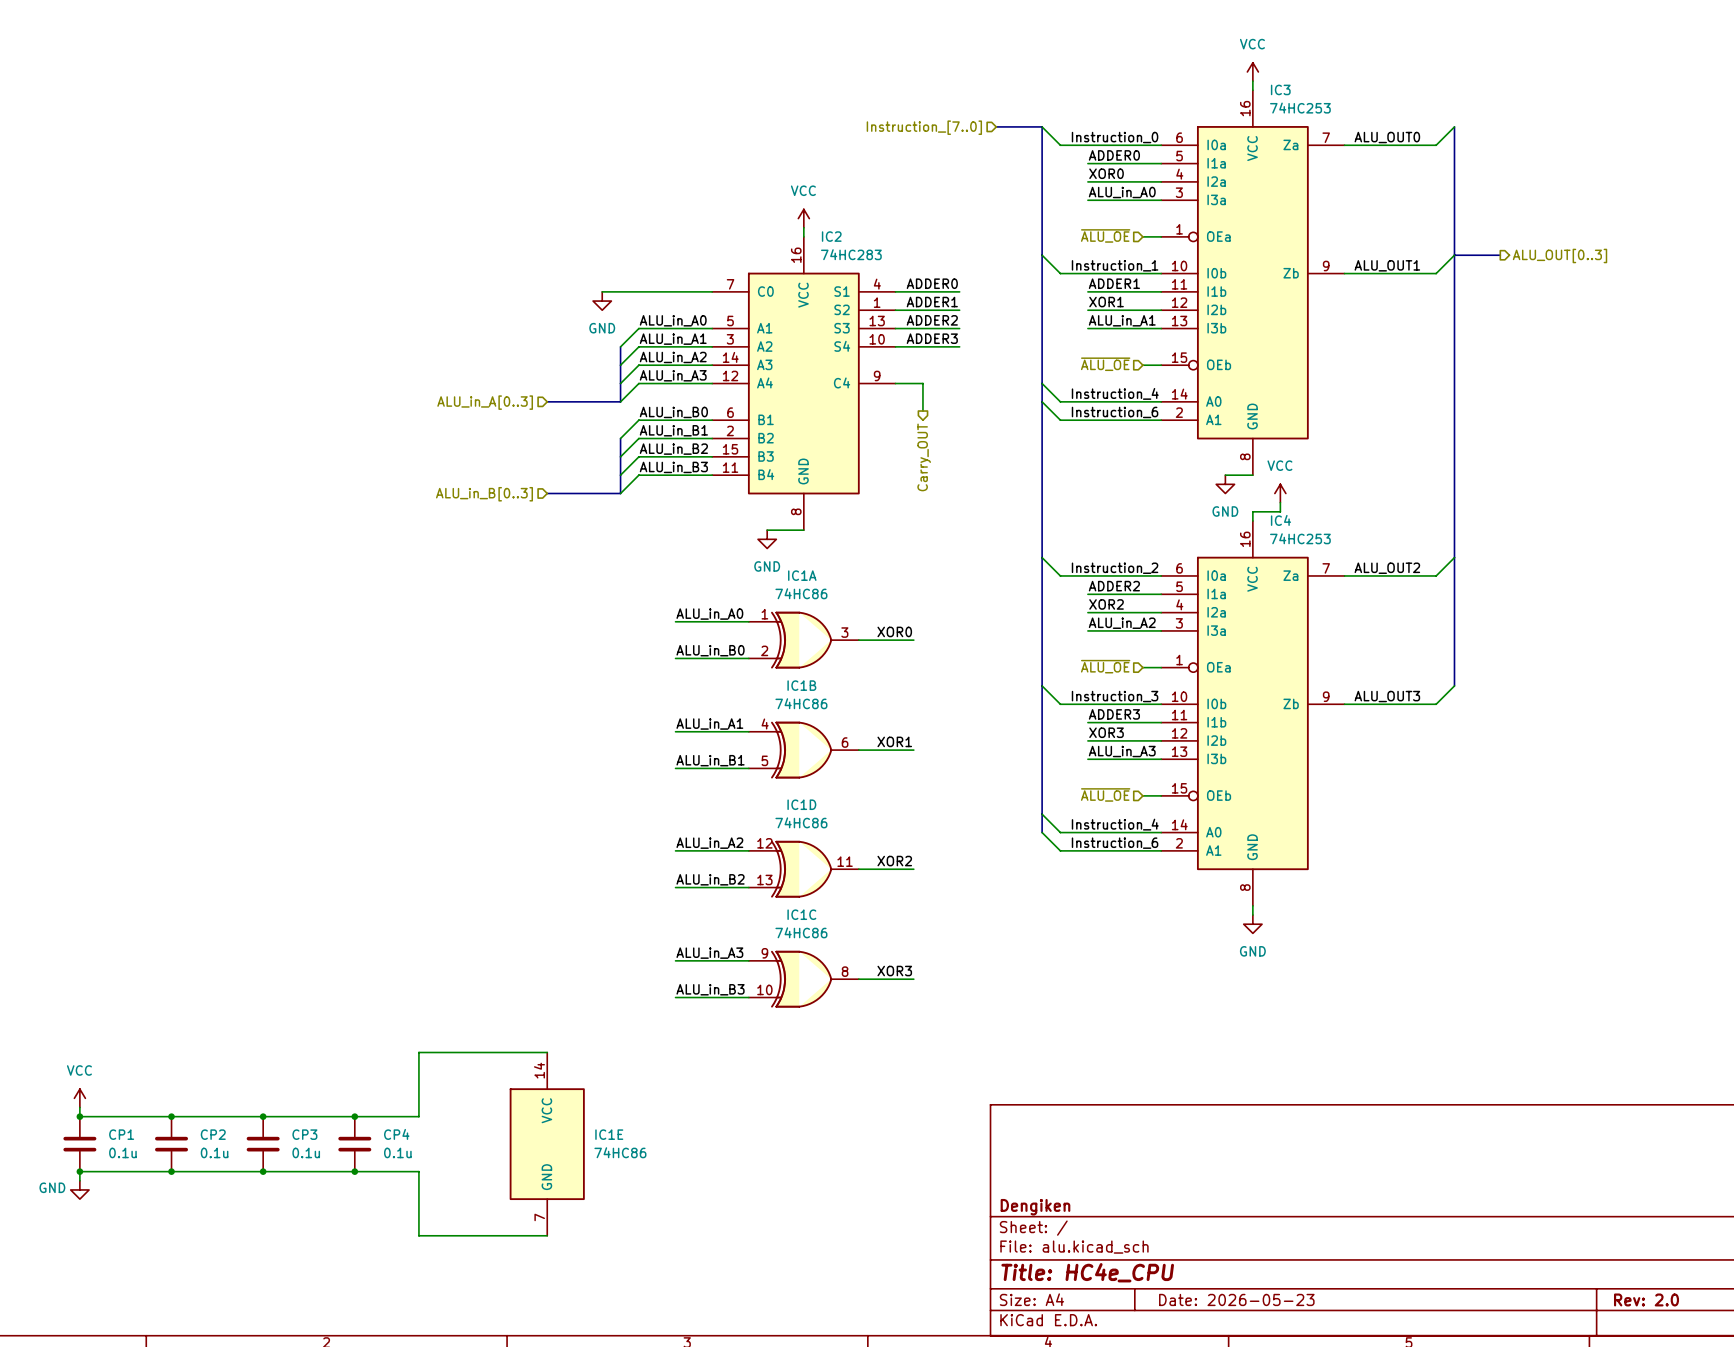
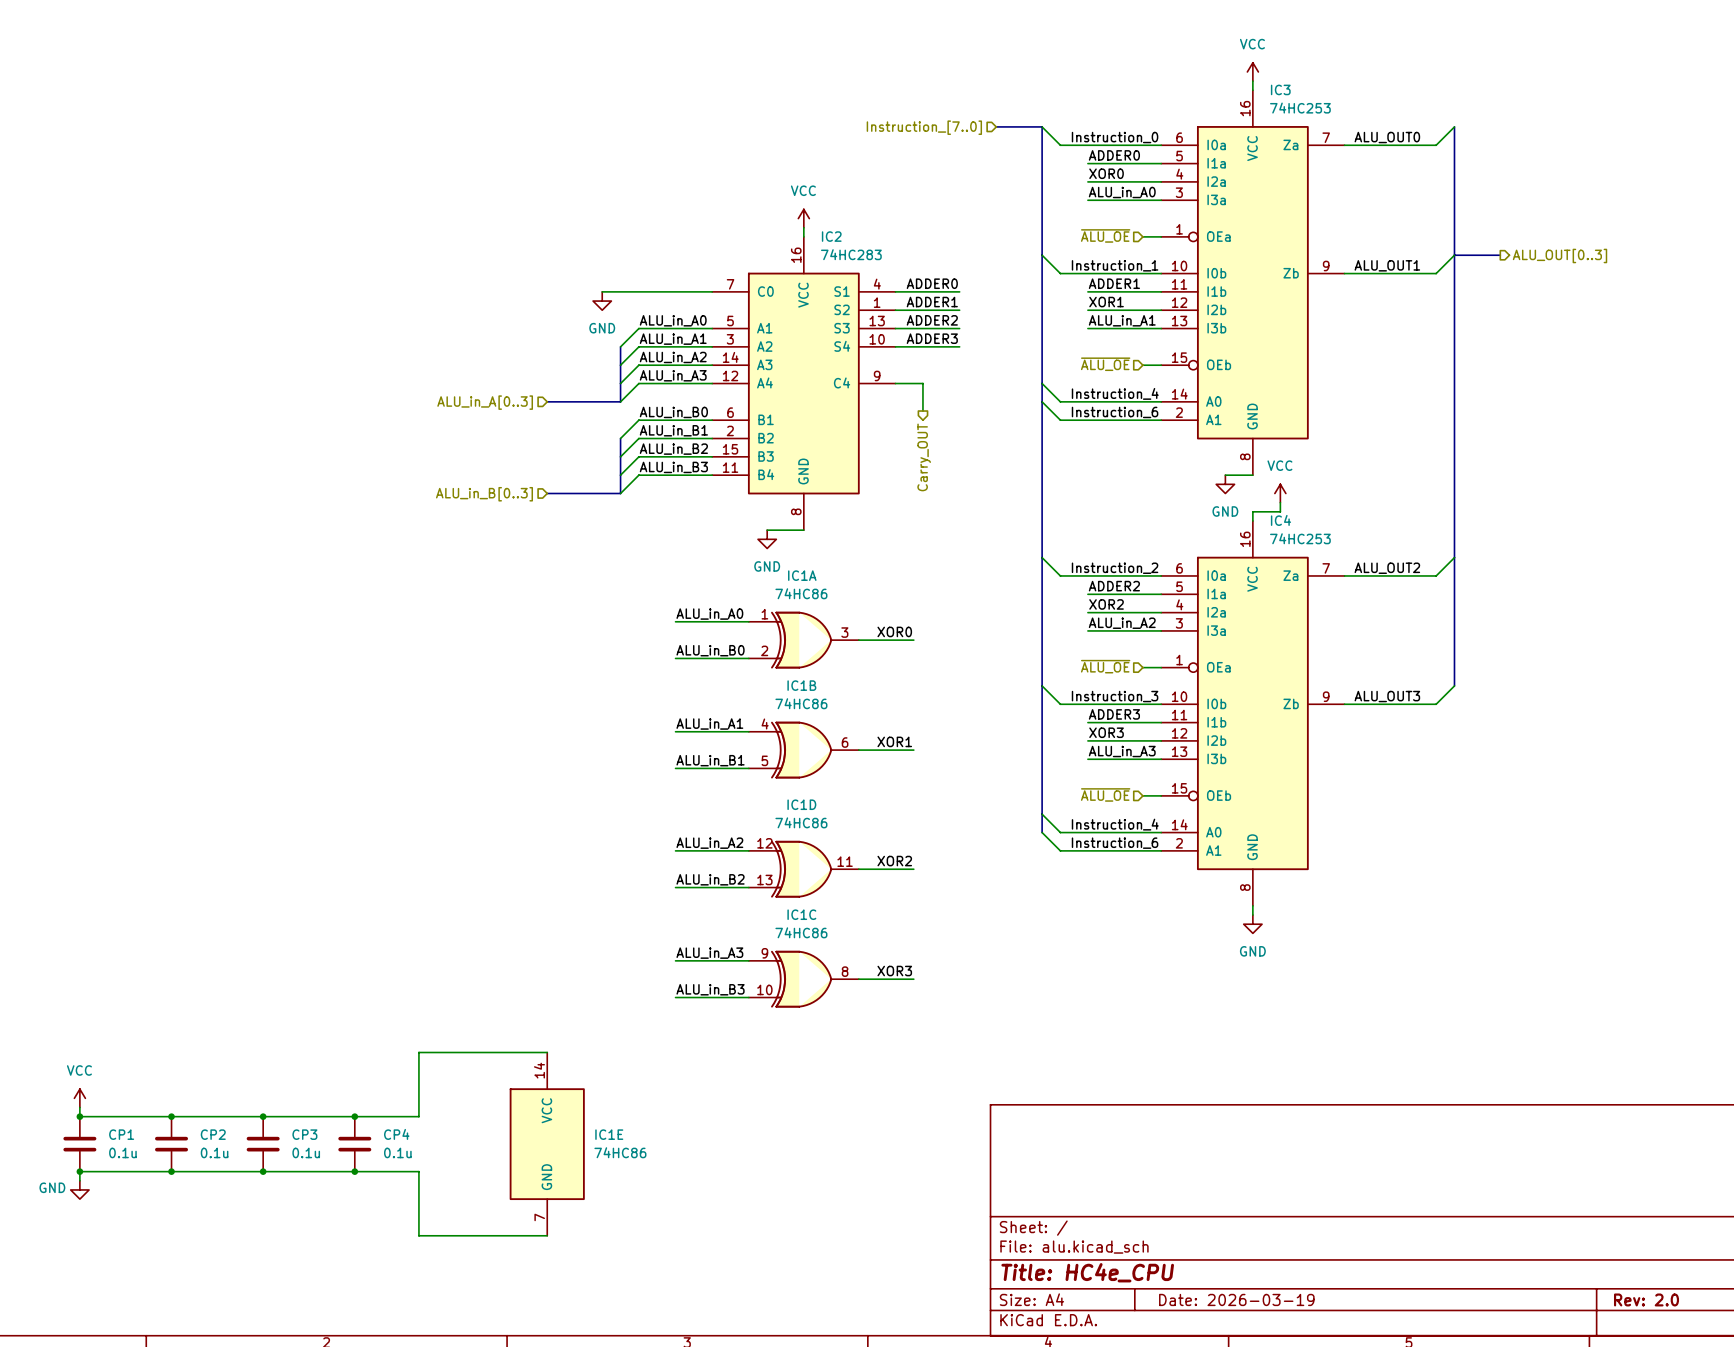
title block: Dengiken (1035, 1207) -> none
title block: Date: 2026-05-23 (1236, 1299) -> Date: 2026-03-19 (1236, 1299)

